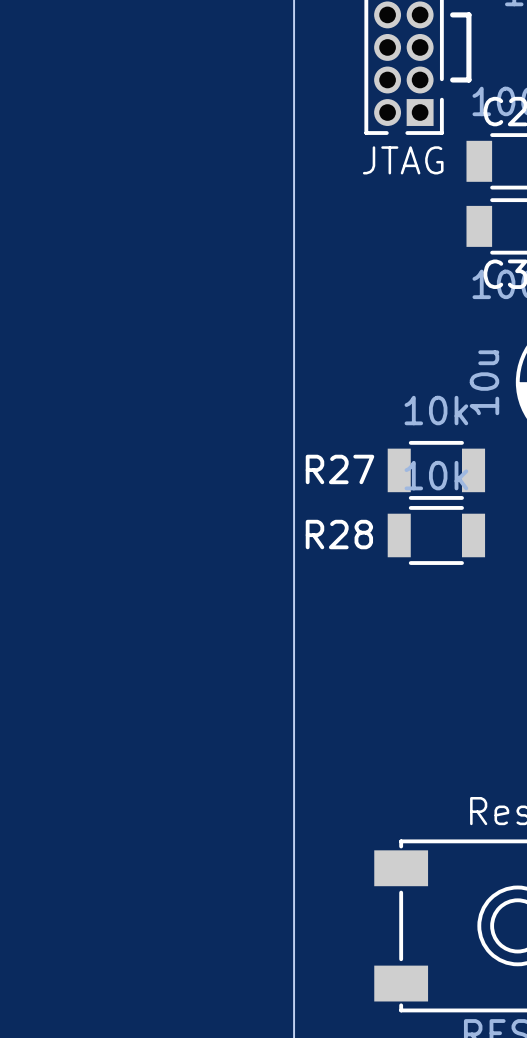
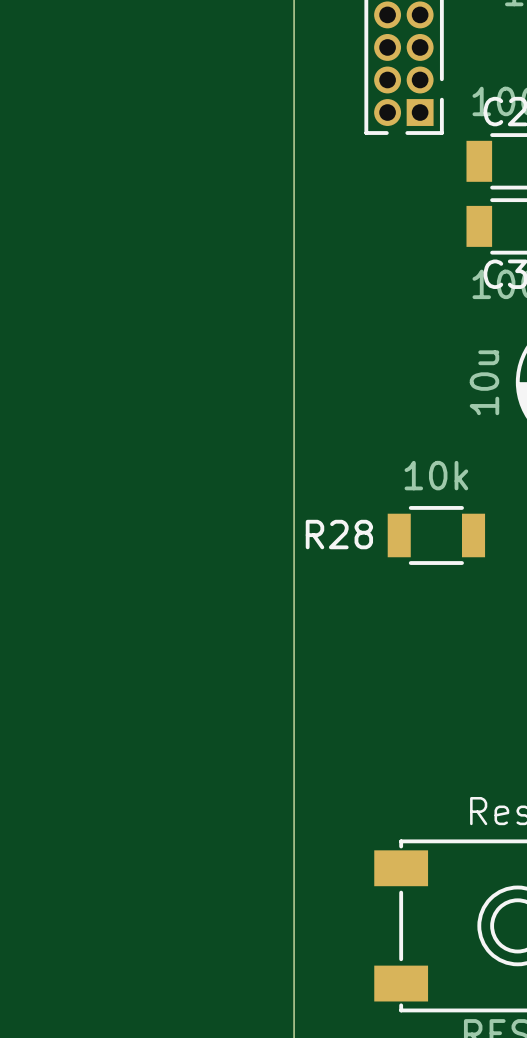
line: (452, 14) (468, 14) (468, 79) (452, 79) -> none
text: JTAG (403, 160) -> none
R27: 10k (436, 470) -> none

